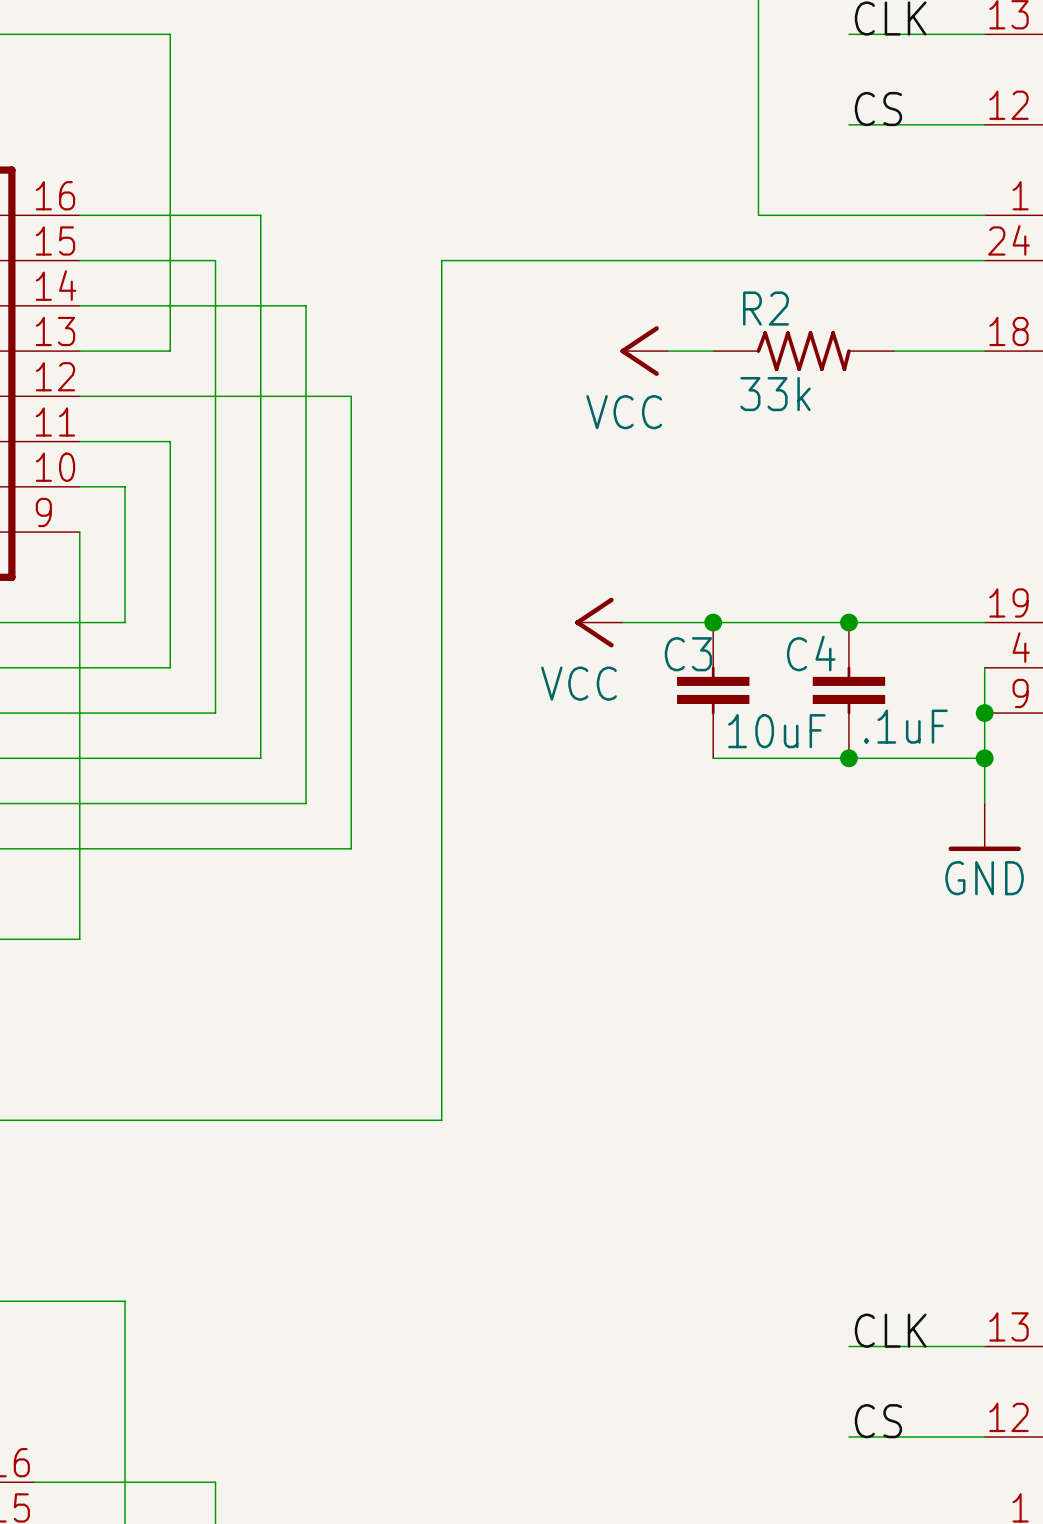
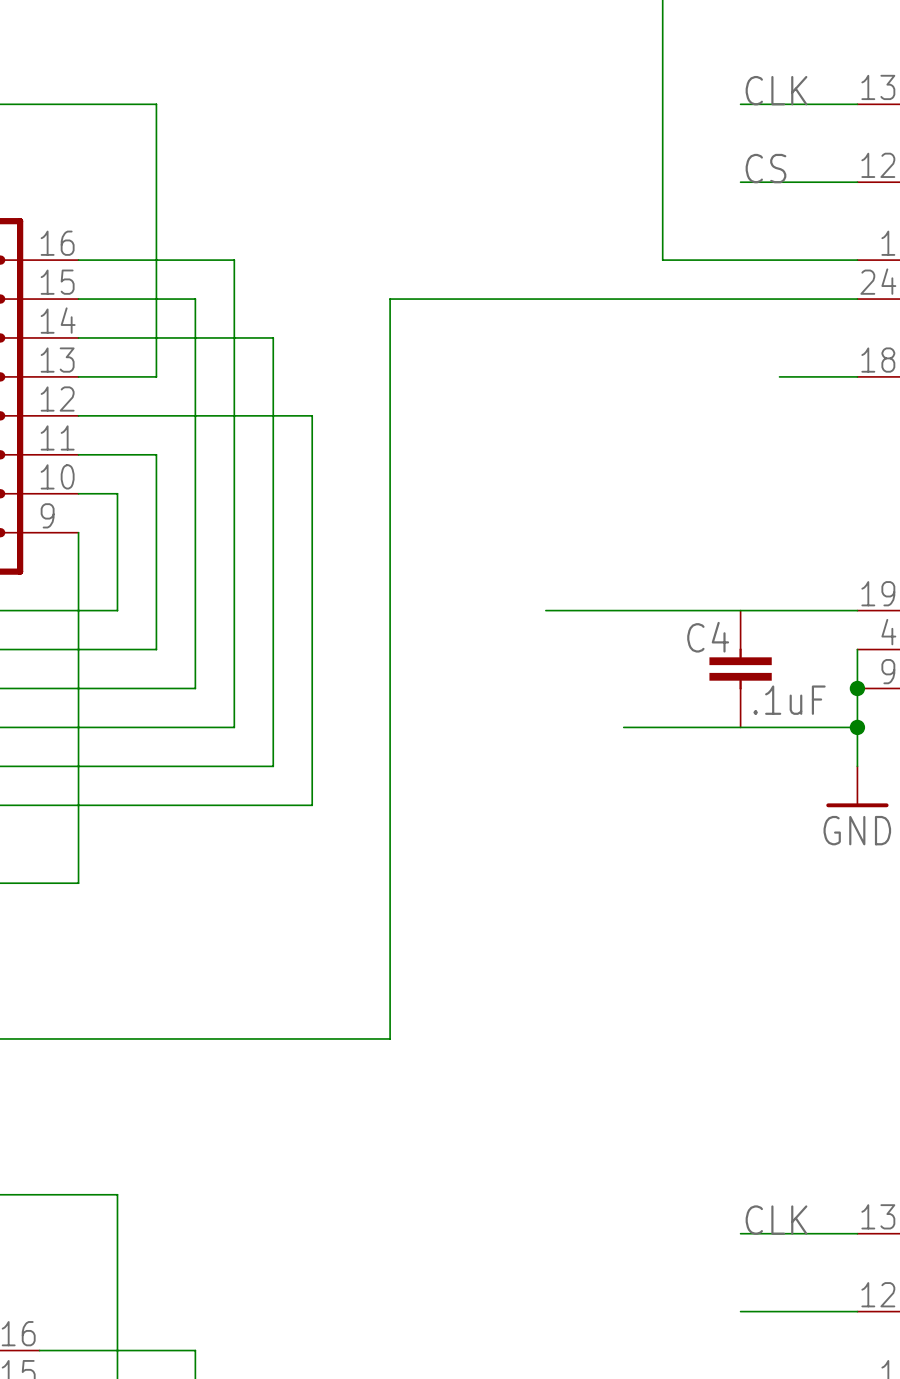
power symbol: VCC (644, 351) -> none
wire: (667, 351) (713, 351) -> none
R2: 33k (803, 351) -> none
power symbol: VCC (598, 622) -> none
junction: (713, 622) -> none
junction: (848, 622) -> none
C3: 10uF (713, 690) -> none
junction: (848, 758) -> none
label: CS (878, 1421) -> none

